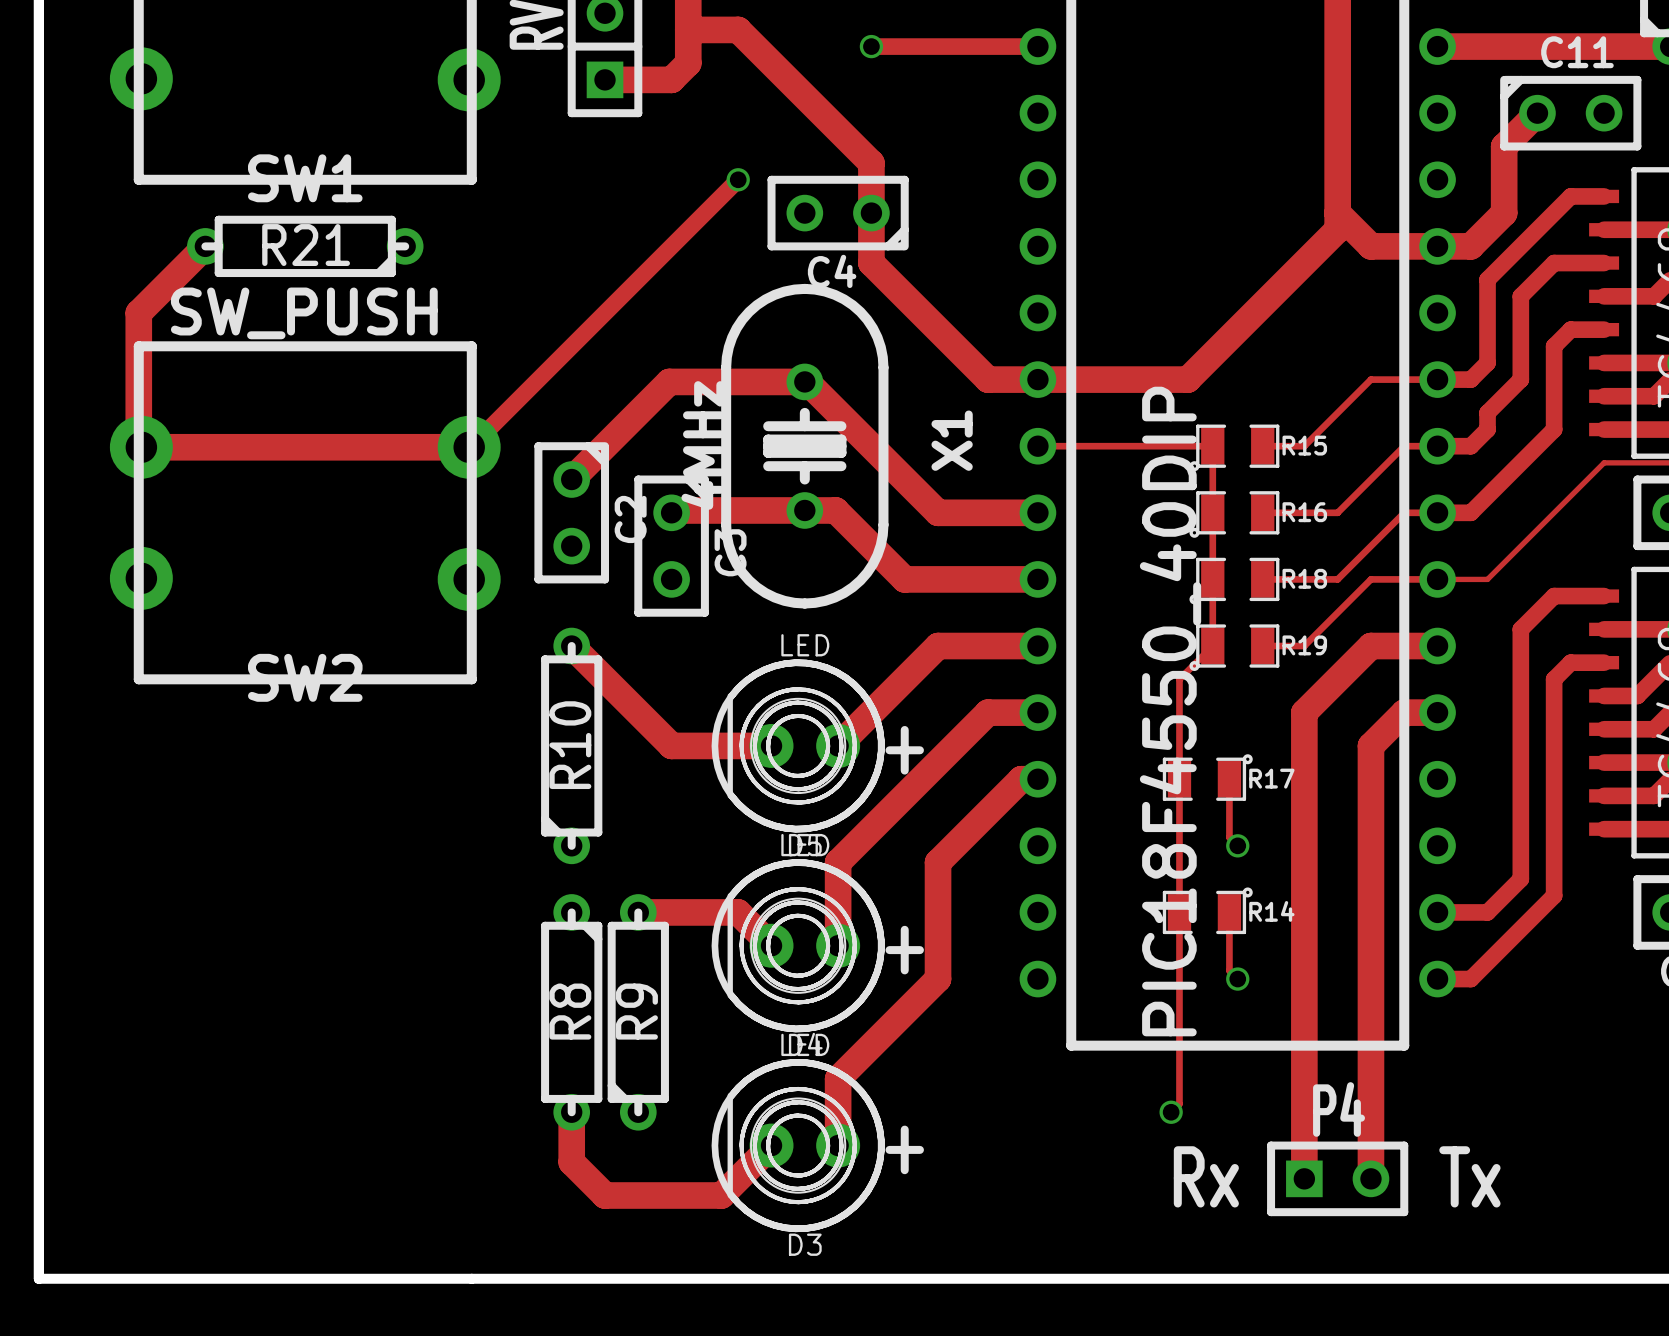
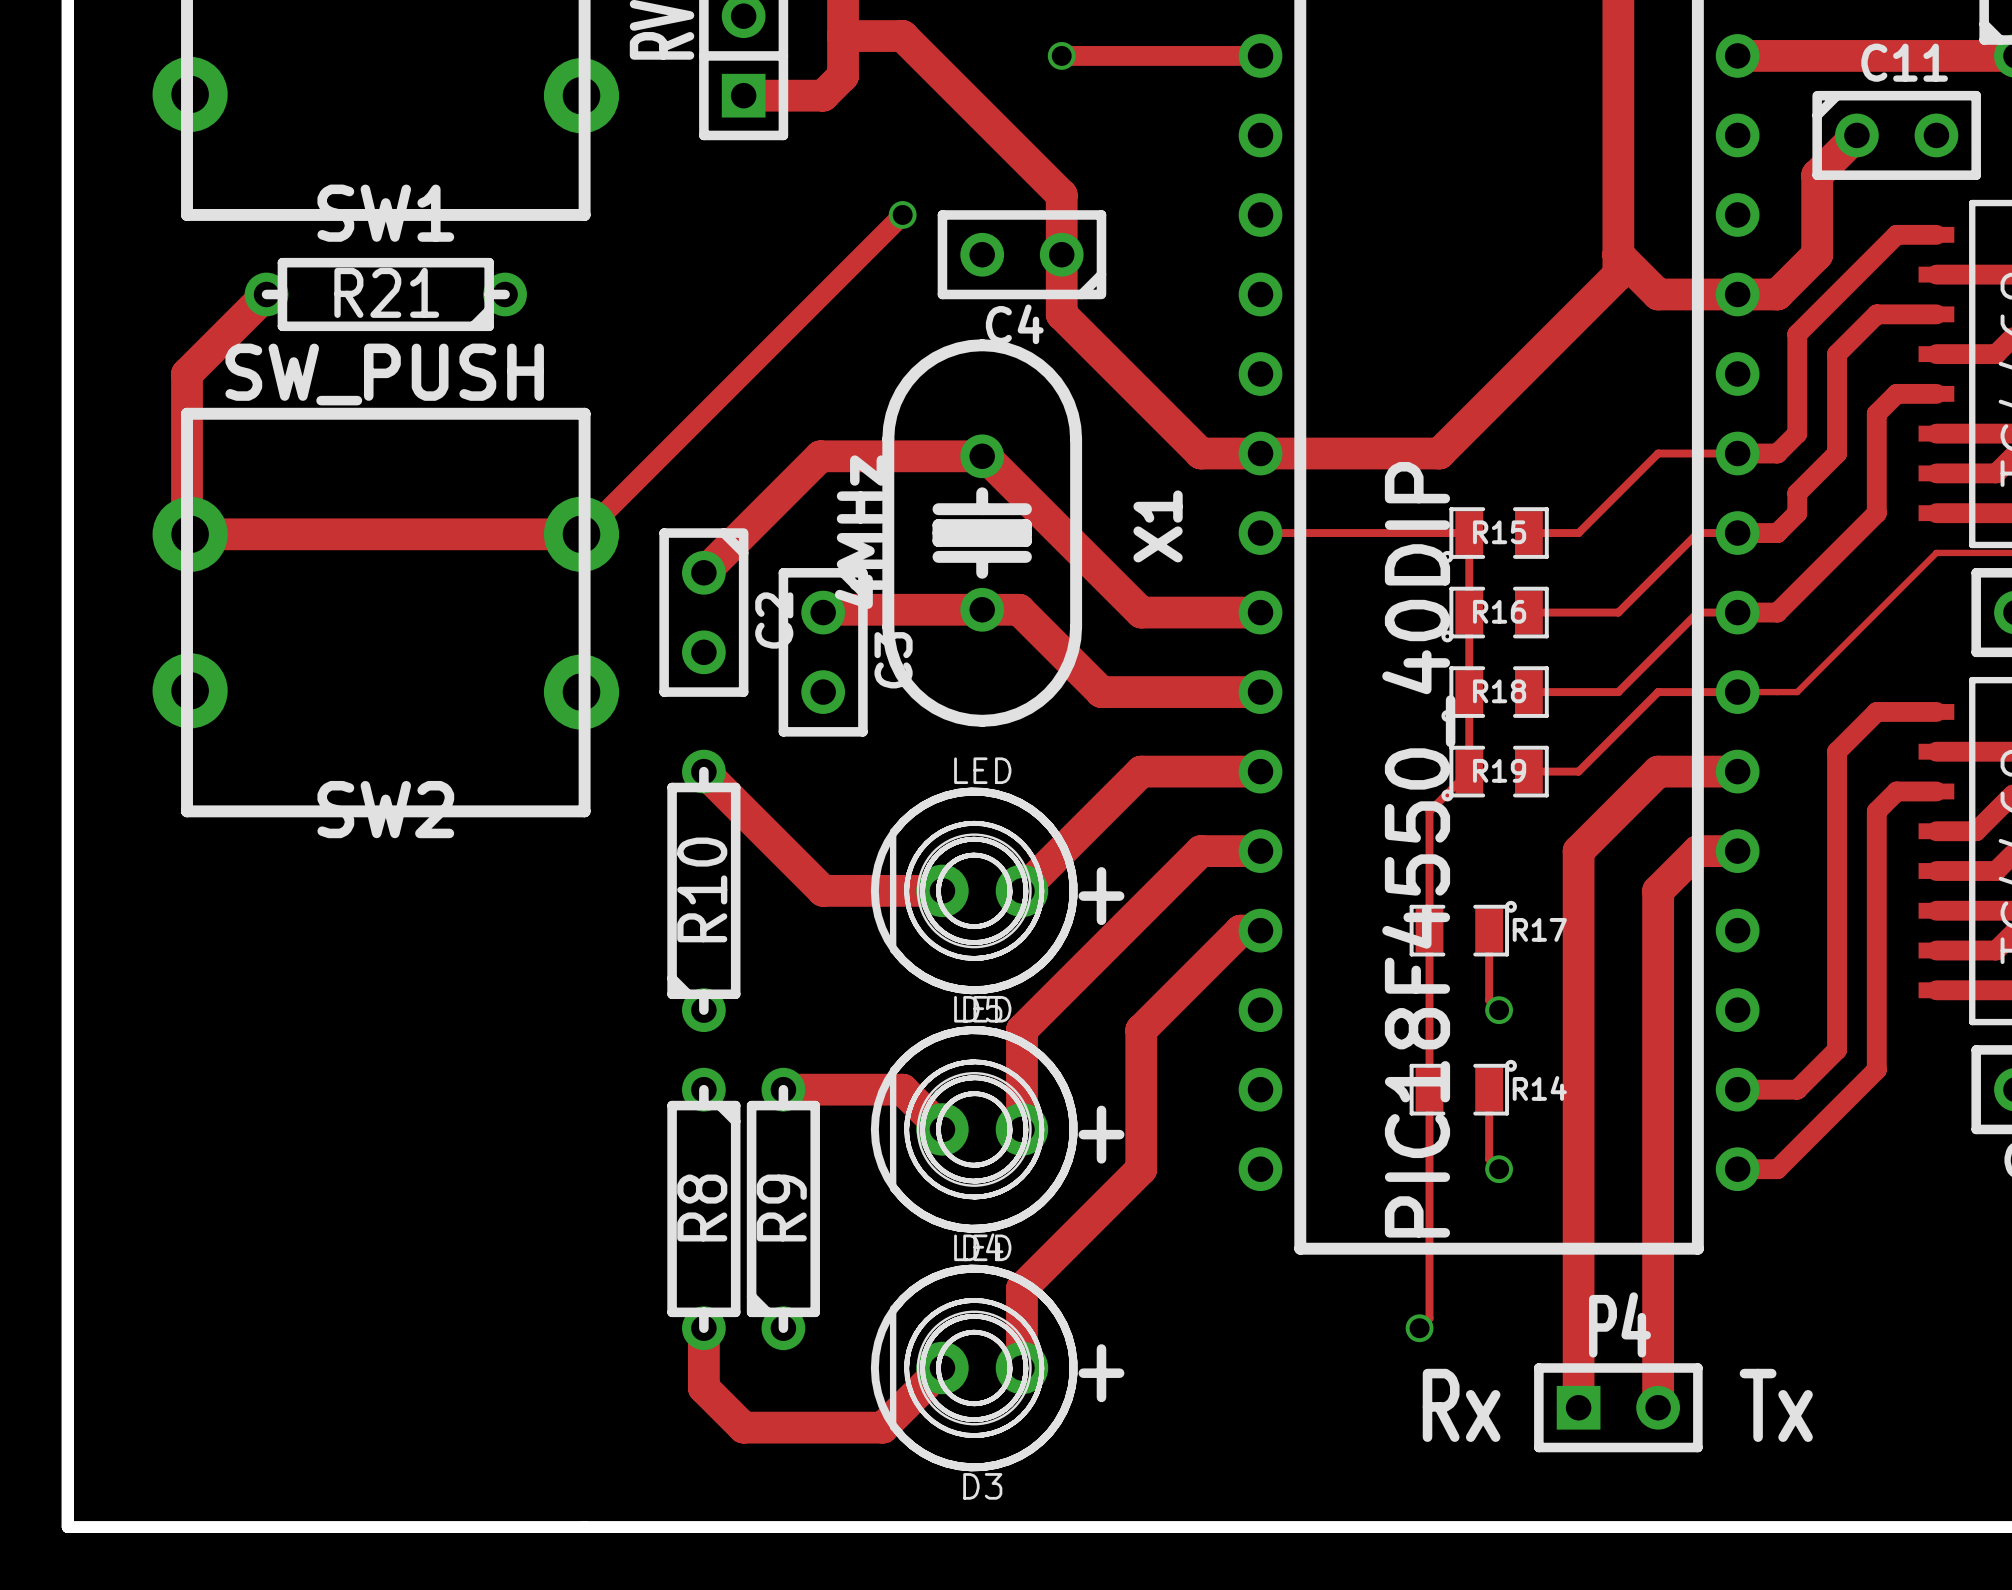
R15 name position: R15 (1304, 445) -> R15 (1499, 532)
R16 name position: R16 (1304, 512) -> R16 (1499, 611)
R18 name position: R18 (1304, 578) -> R18 (1499, 691)
R19 name position: R19 (1304, 645) -> R19 (1499, 770)

